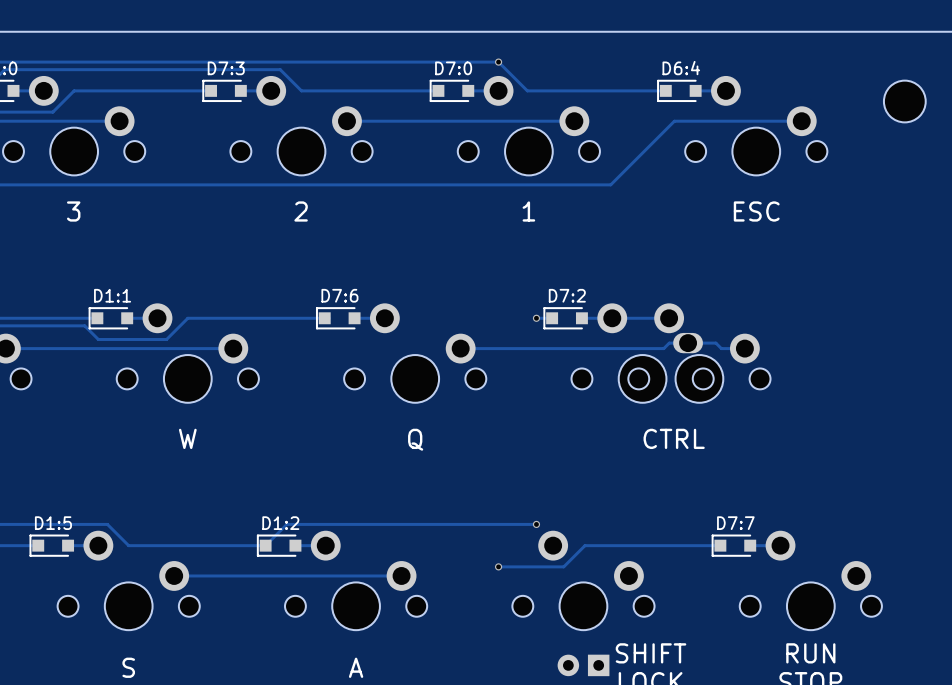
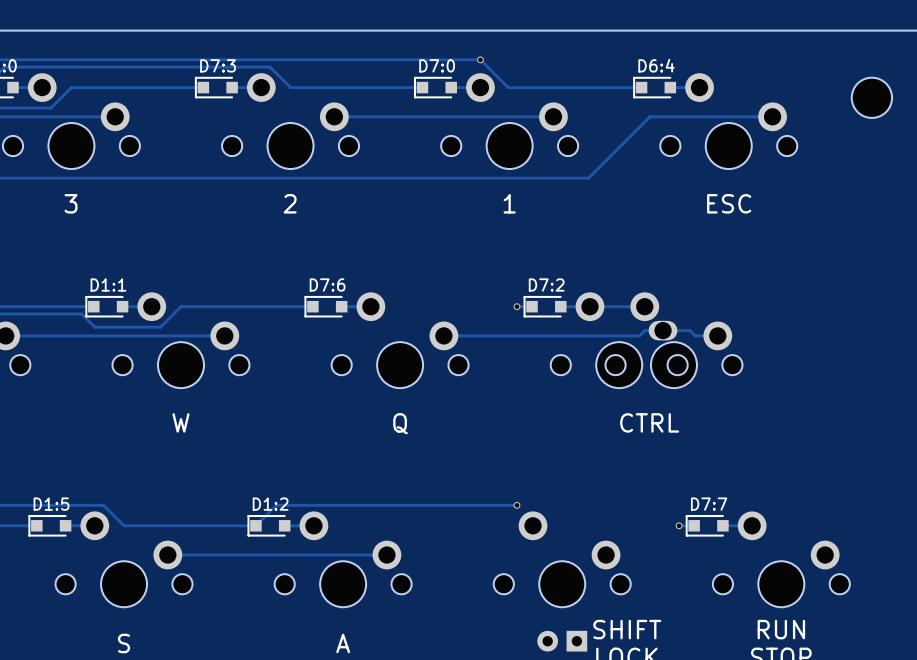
track: (704, 545) (584, 545) (563, 566) (498, 566) -> none
via: none -> (679, 525)
via: (498, 566) -> none

